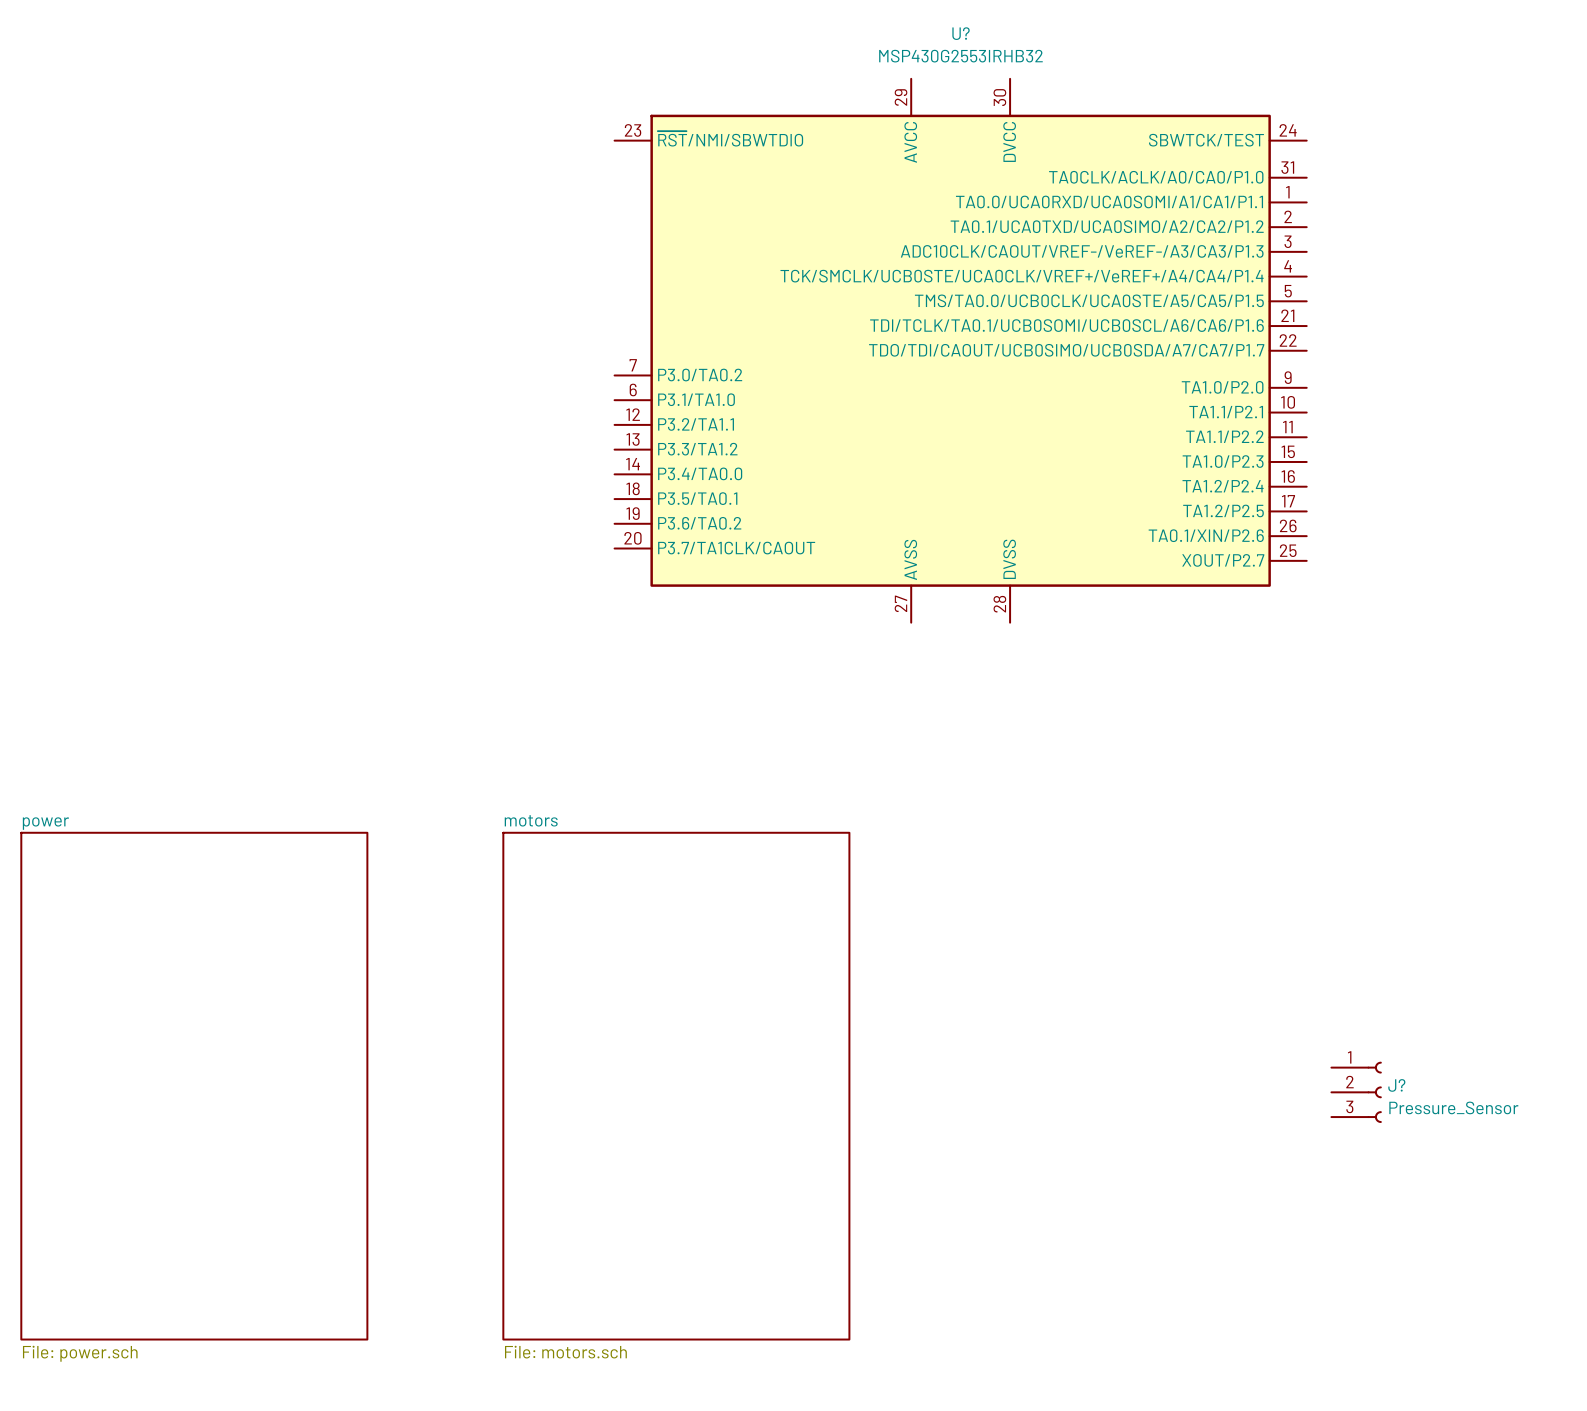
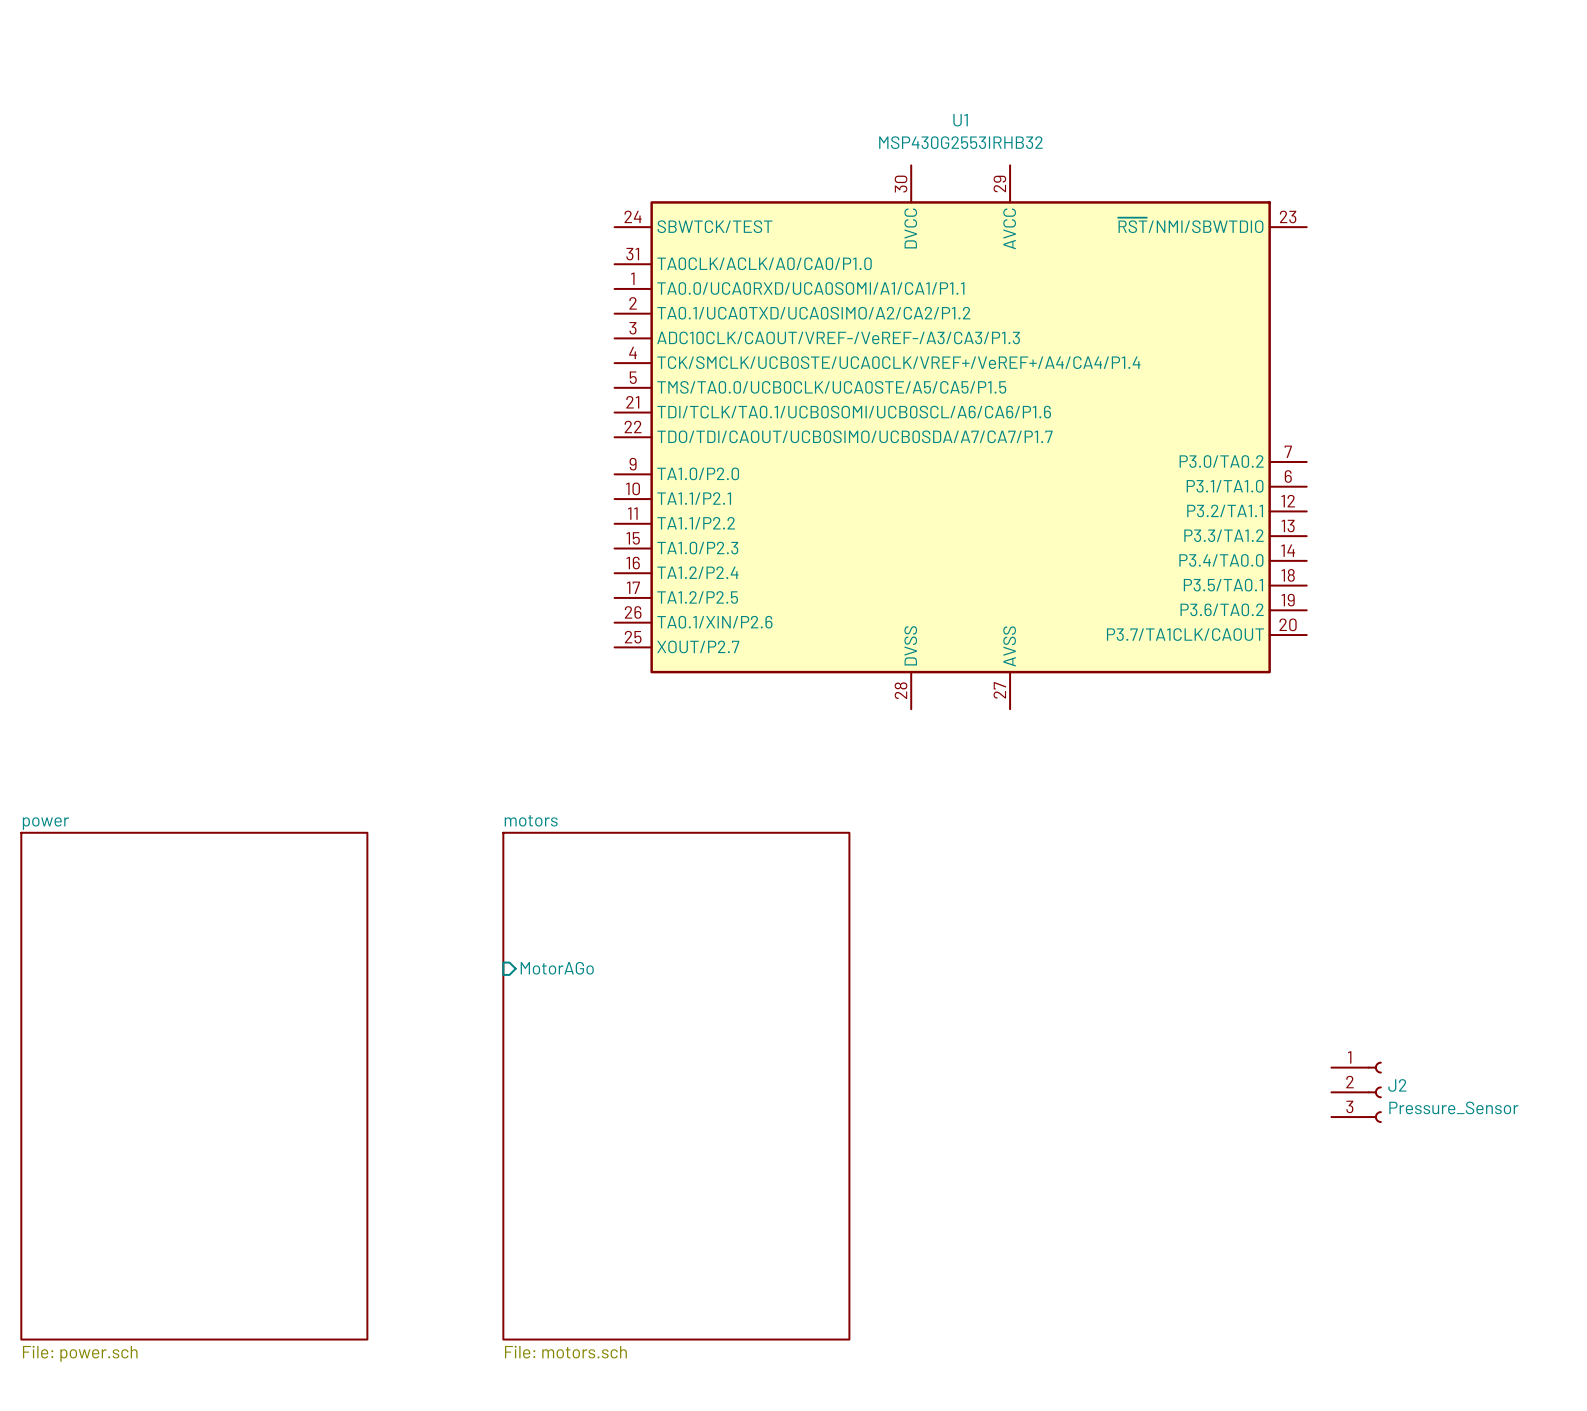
U?: MSP430G2553IRHB32 (960, 350) -> none
U1: none -> MSP430G2553IRHB32 (960, 437)
sheet pin: none -> MotorAGo (557, 968)
J? name: J? (1396, 1085) -> J2 (1397, 1085)

